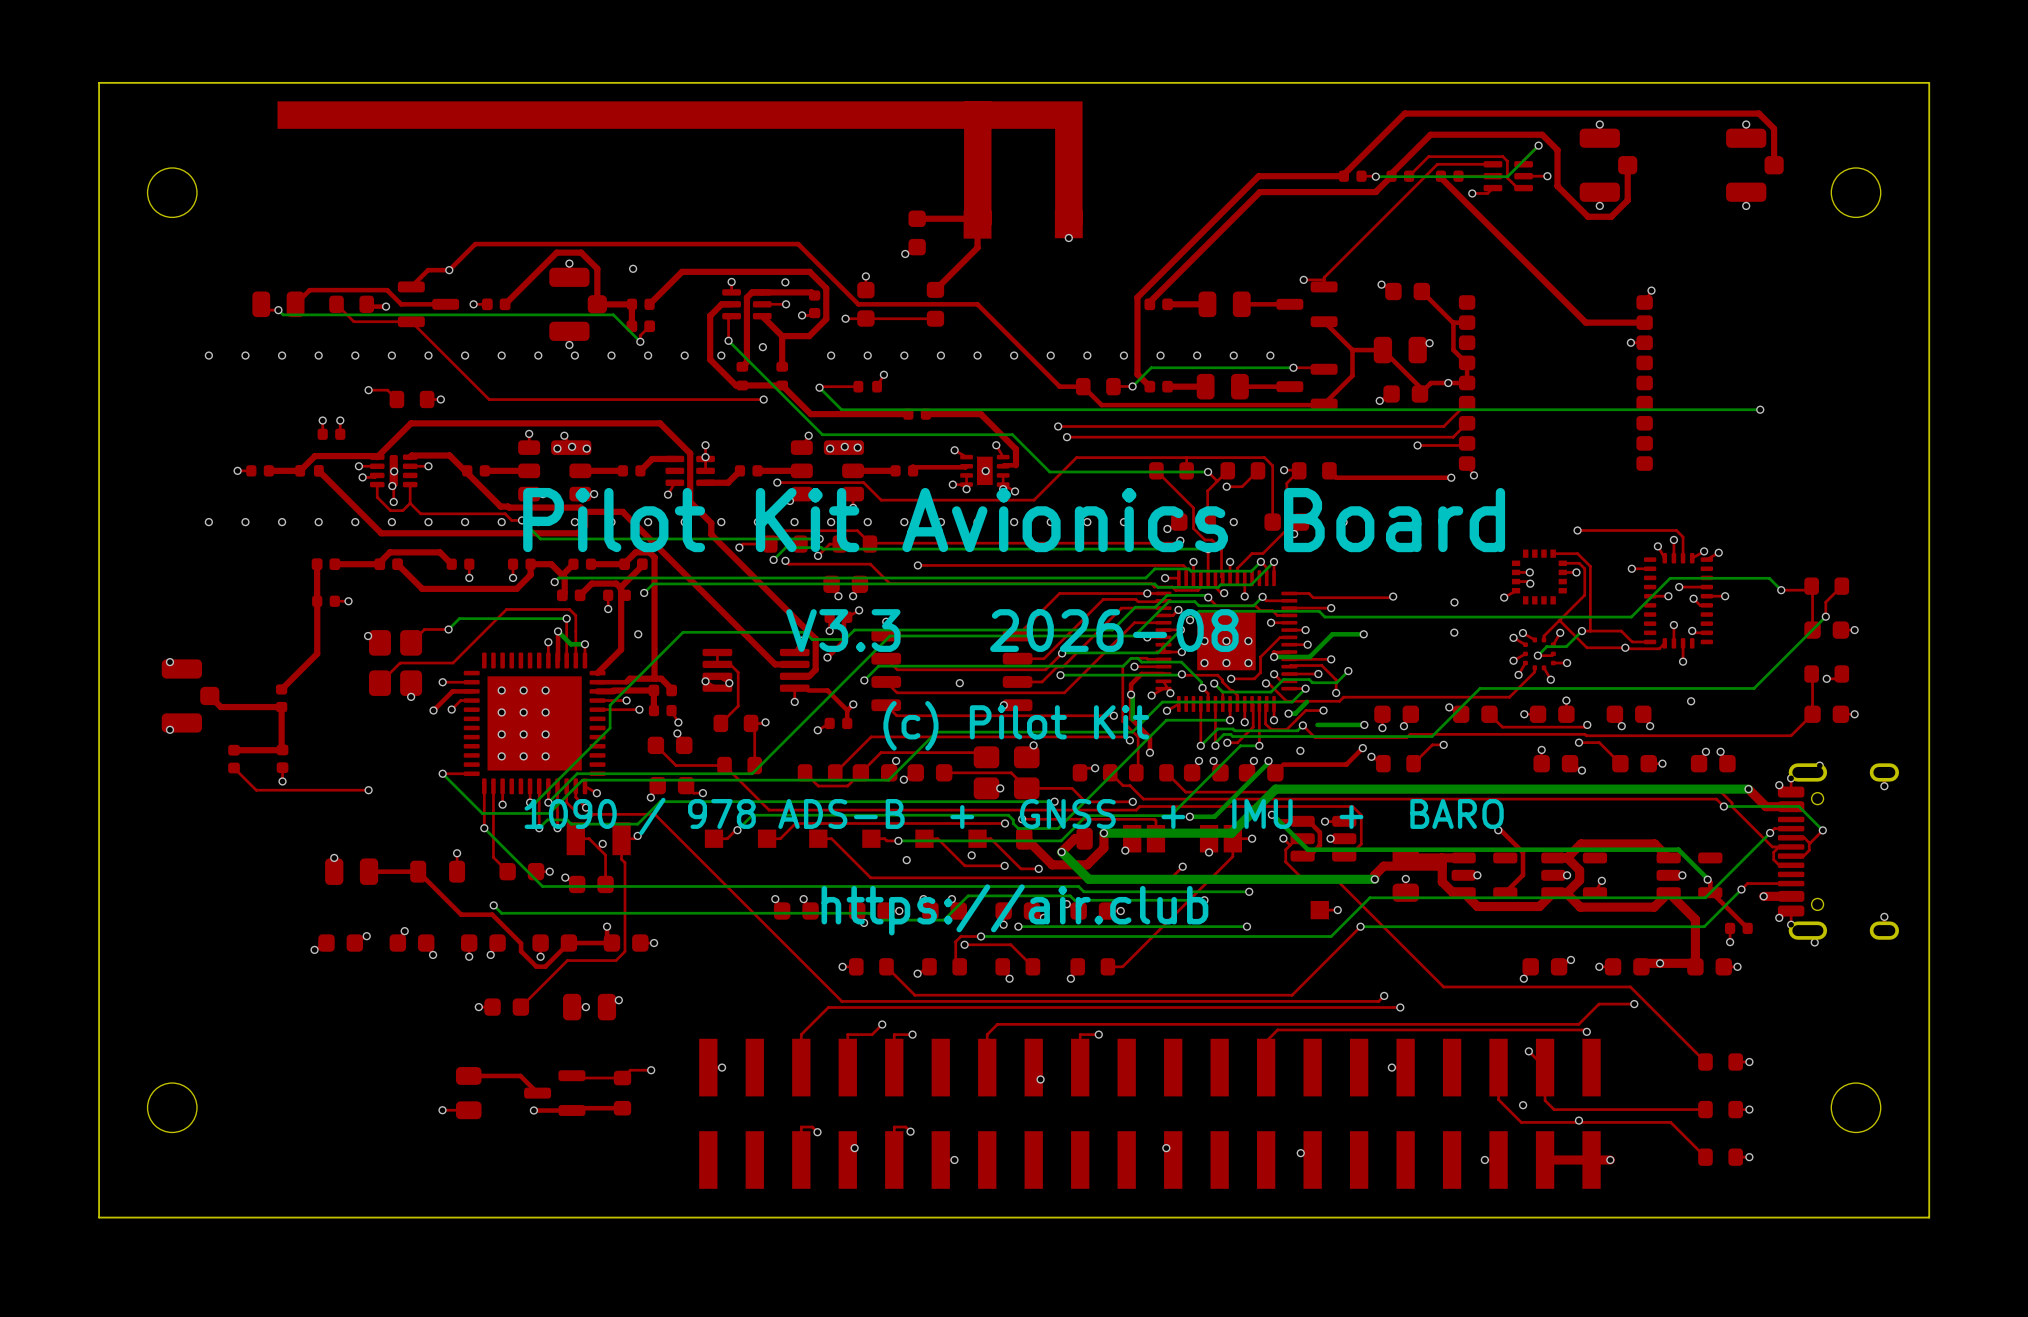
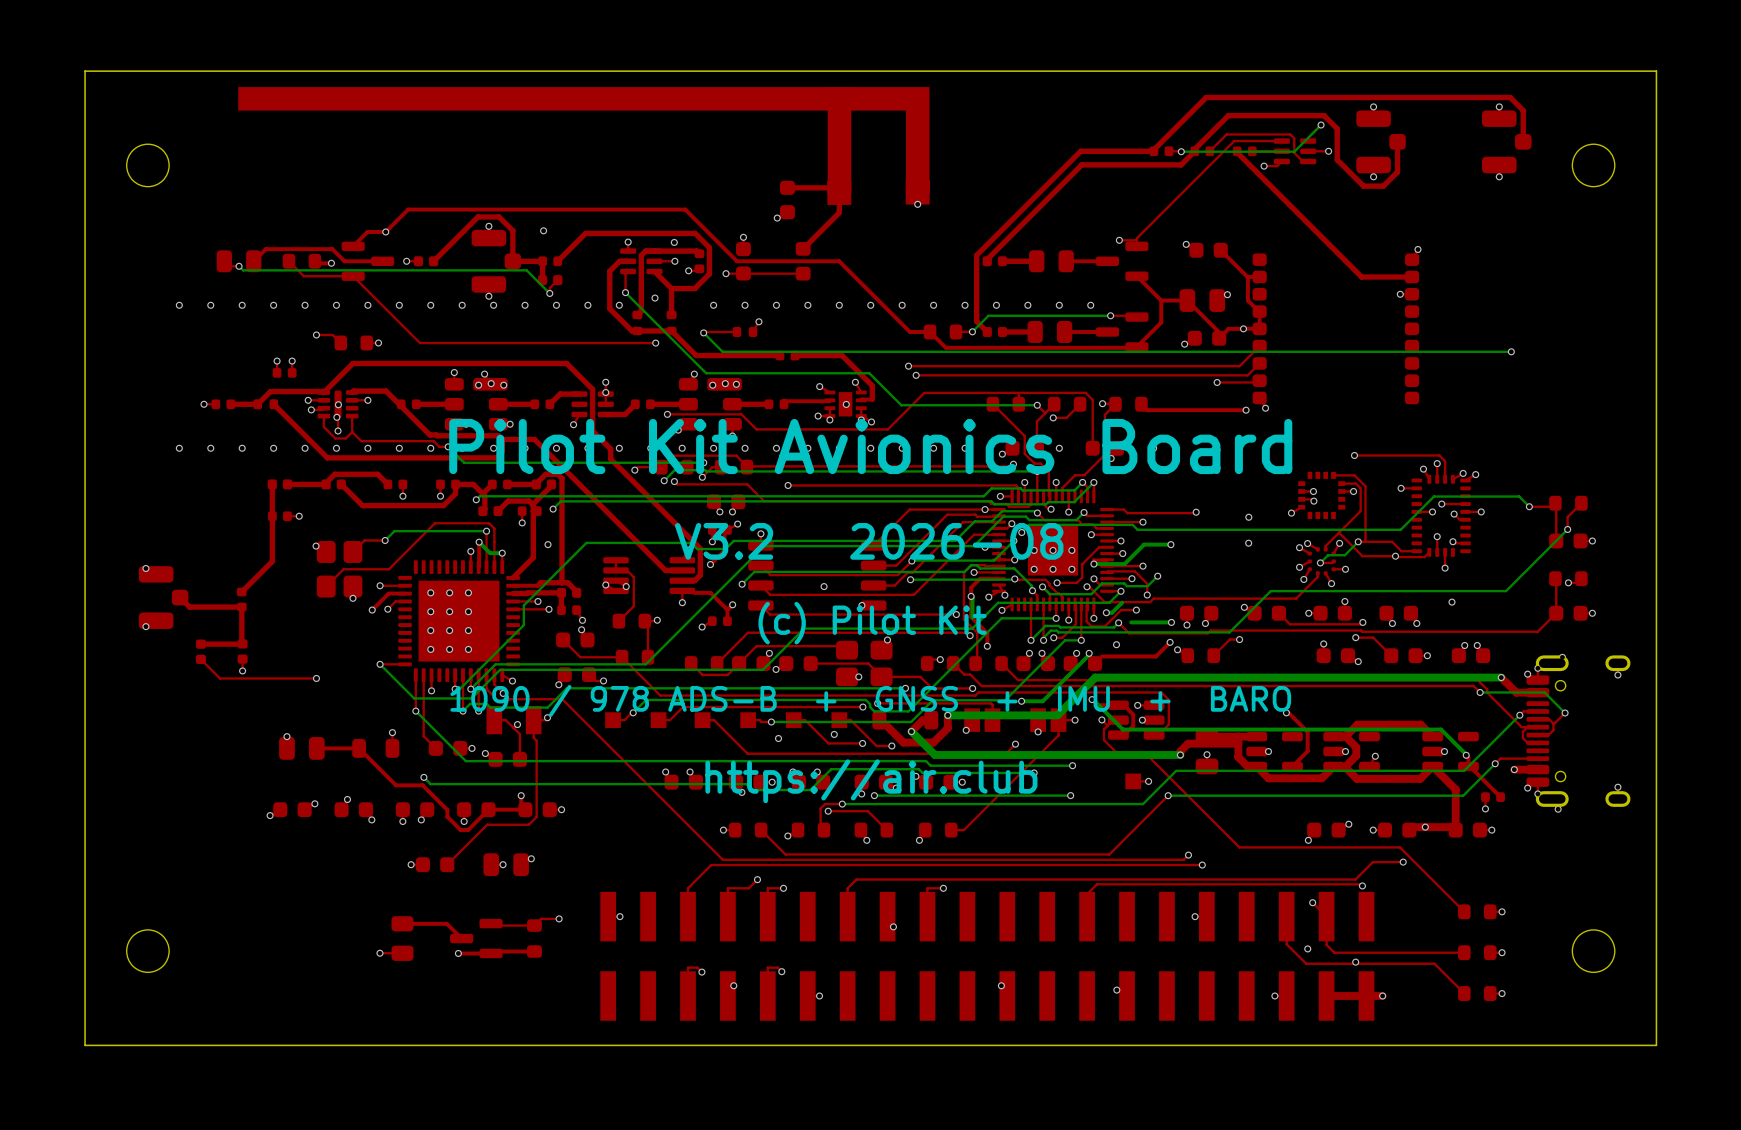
text: V3.3 2026-08 (1012, 630) -> V3.2 2026-08 (869, 541)

